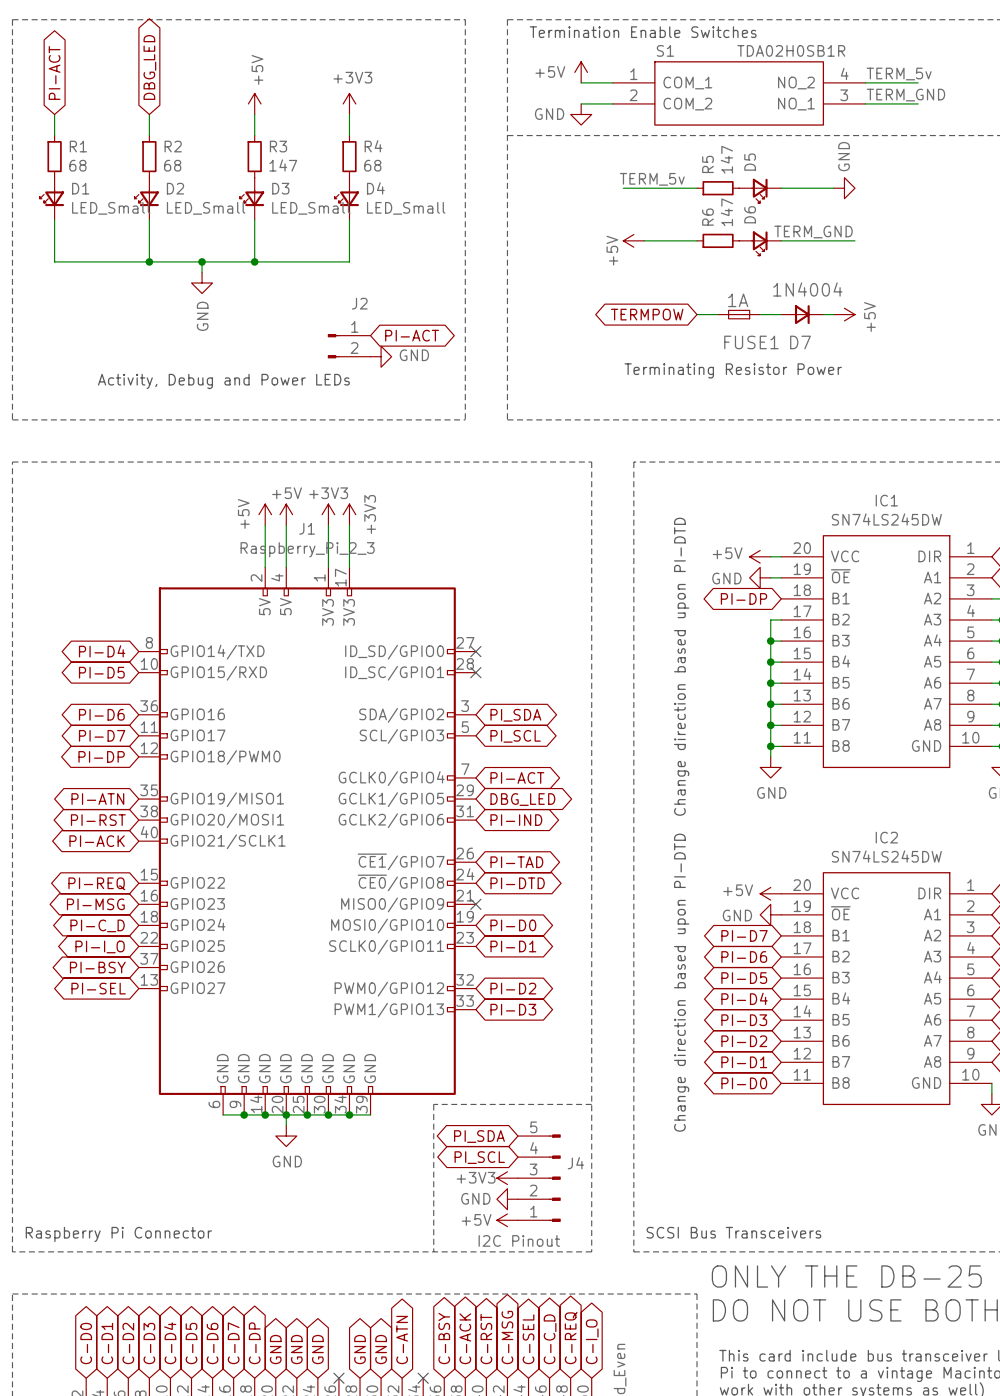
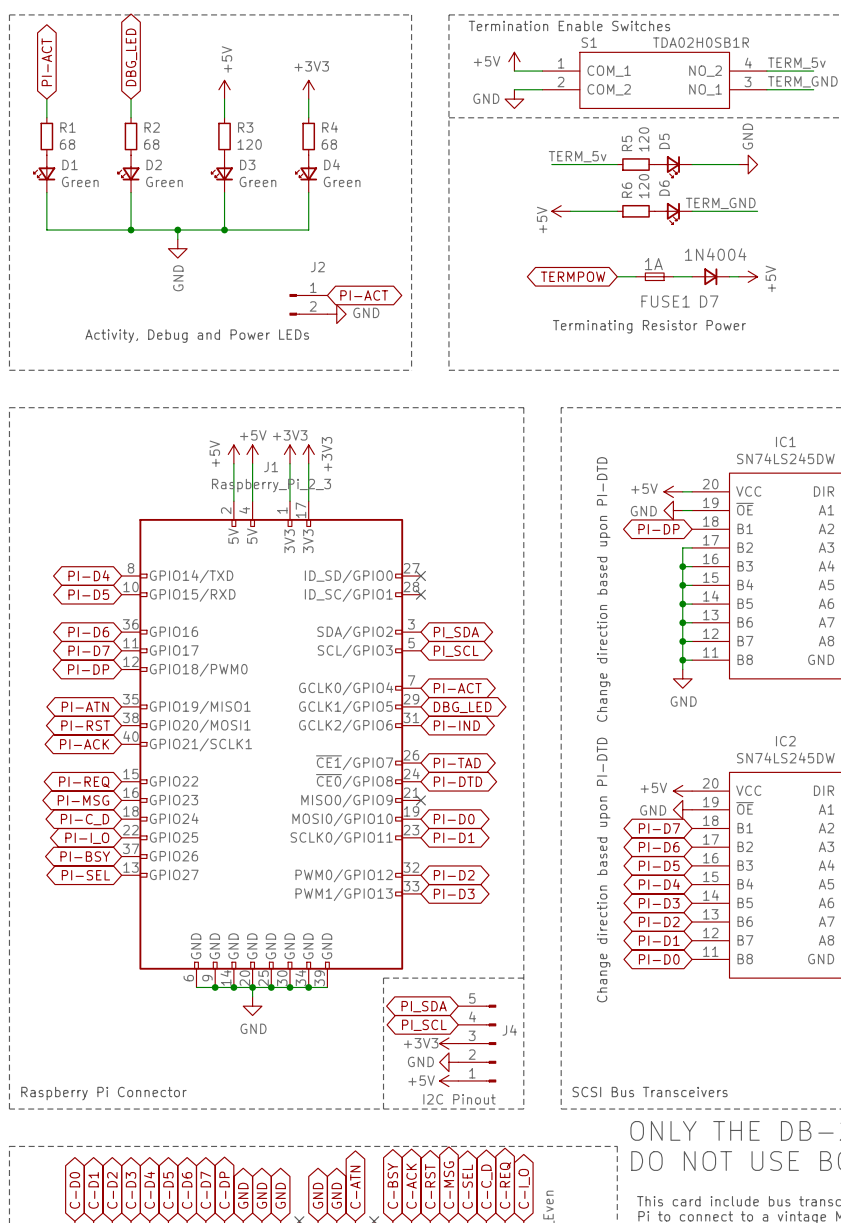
R5 value: 147 (726, 159) -> 120 (644, 139)
R3 value: 147 (283, 165) -> 120 (249, 144)
D1 value: LED_Small (111, 208) -> Green (80, 181)
D2 value: LED_Small (206, 208) -> Green (164, 181)
D3 value: LED_Small (311, 208) -> Green (257, 181)
D4 value: LED_Small (406, 208) -> Green (342, 181)
R6 value: 147 (726, 212) -> 120 (644, 186)

